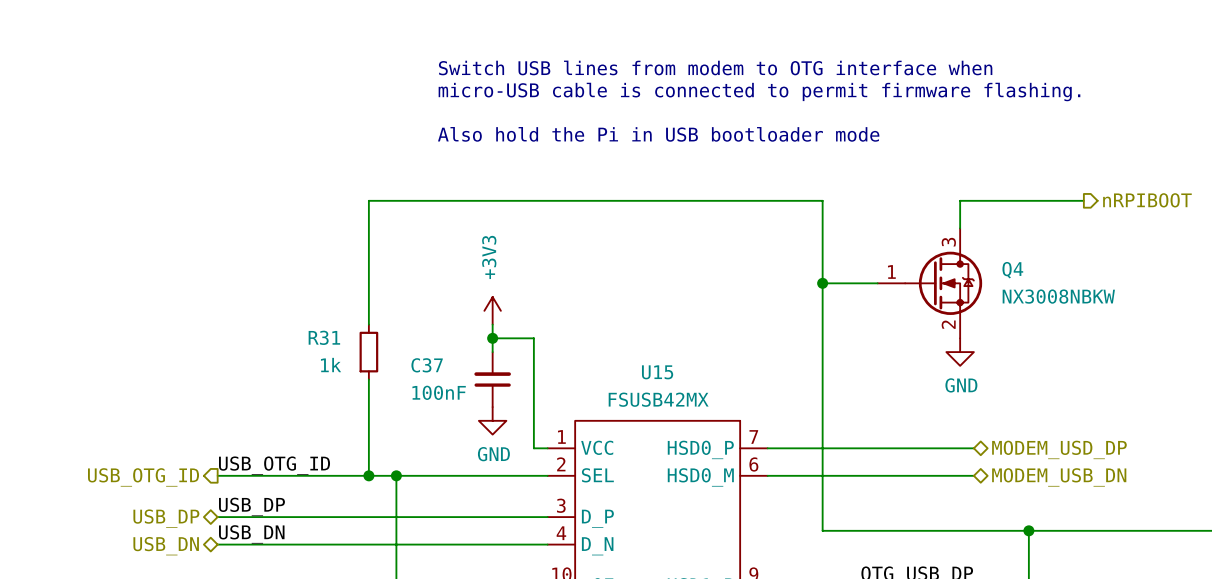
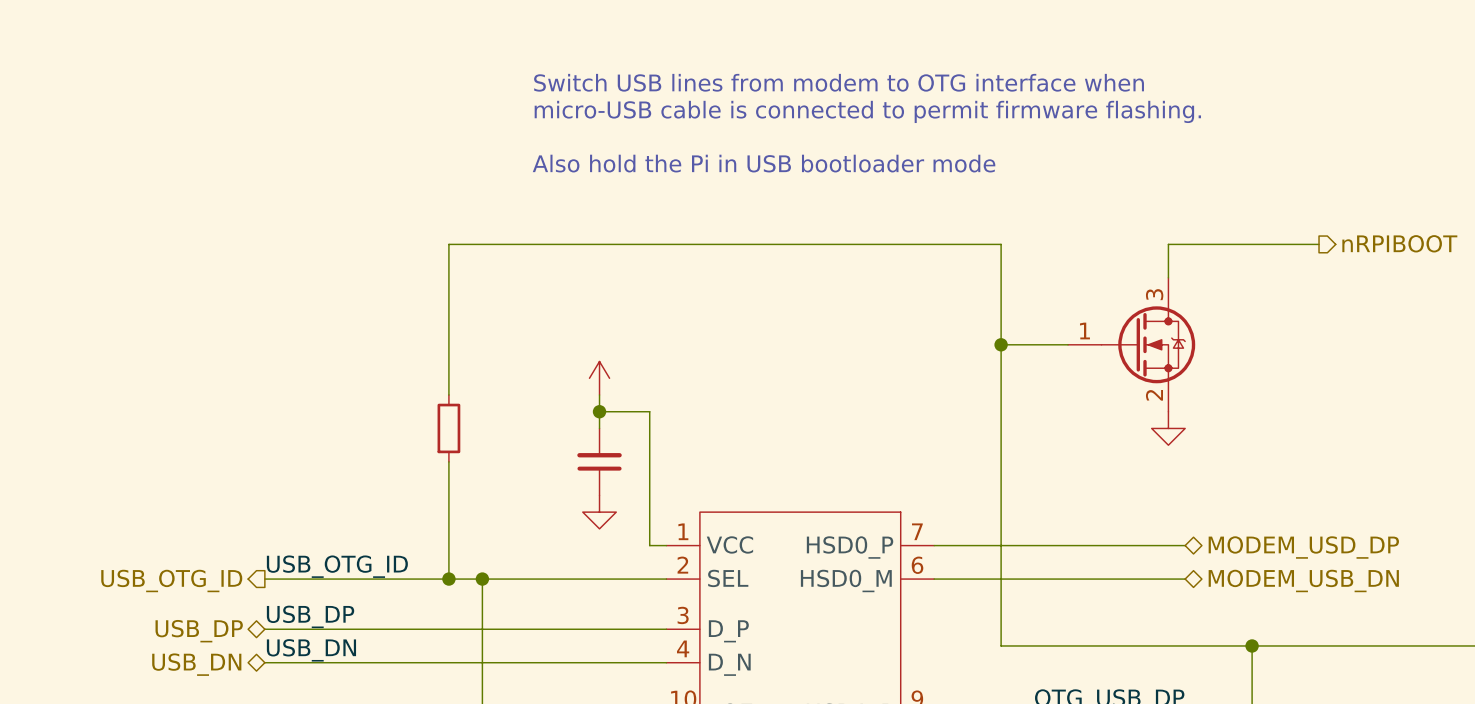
power symbol text: +3V3 (489, 257) -> none
Q4 name: Q4 (1012, 270) -> none
Q4 value: NX3008NBKW (1058, 296) -> none
R31 name: R31 (324, 337) -> none
R31 value: 1k (331, 365) -> none
C37 name: C37 (427, 365) -> none
U15 name: U15 (657, 372) -> none
power symbol text: GND (961, 385) -> none
C37 value: 100nF (439, 392) -> none
U15 value: FSUSB42MX (658, 399) -> none
power symbol text: GND (493, 454) -> none

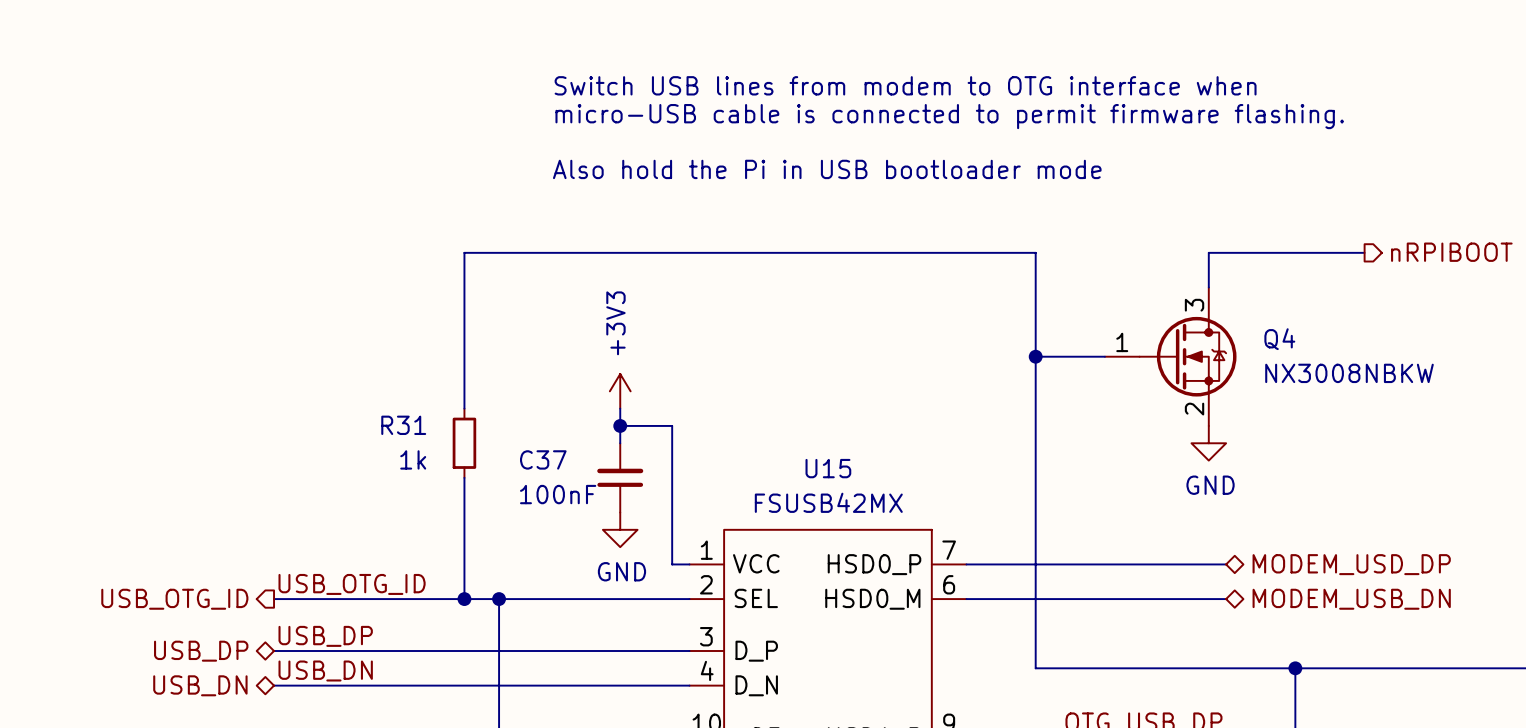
power symbol text: none -> +3V3 (615, 323)
Q4 name: none -> Q4 (1279, 339)
Q4 value: none -> NX3008NBKW (1349, 373)
R31 name: none -> R31 (403, 425)
R31 value: none -> 1k (413, 459)
C37 name: none -> C37 (543, 459)
U15 name: none -> U15 (828, 468)
power symbol text: none -> GND (1210, 485)
C37 value: none -> 100nF (558, 494)
U15 value: none -> FSUSB42MX (828, 502)
power symbol text: none -> GND (621, 571)

